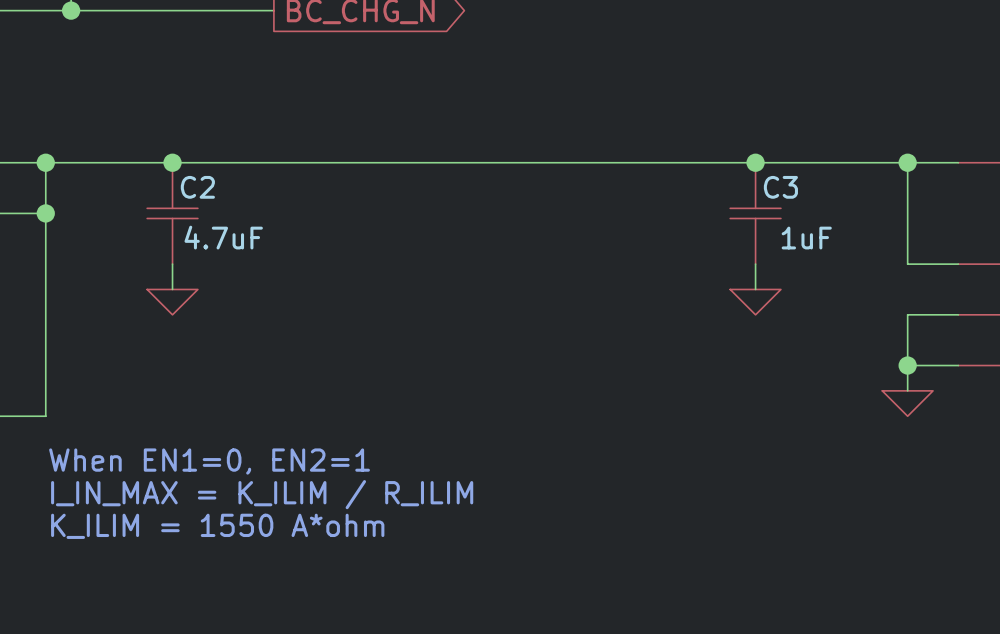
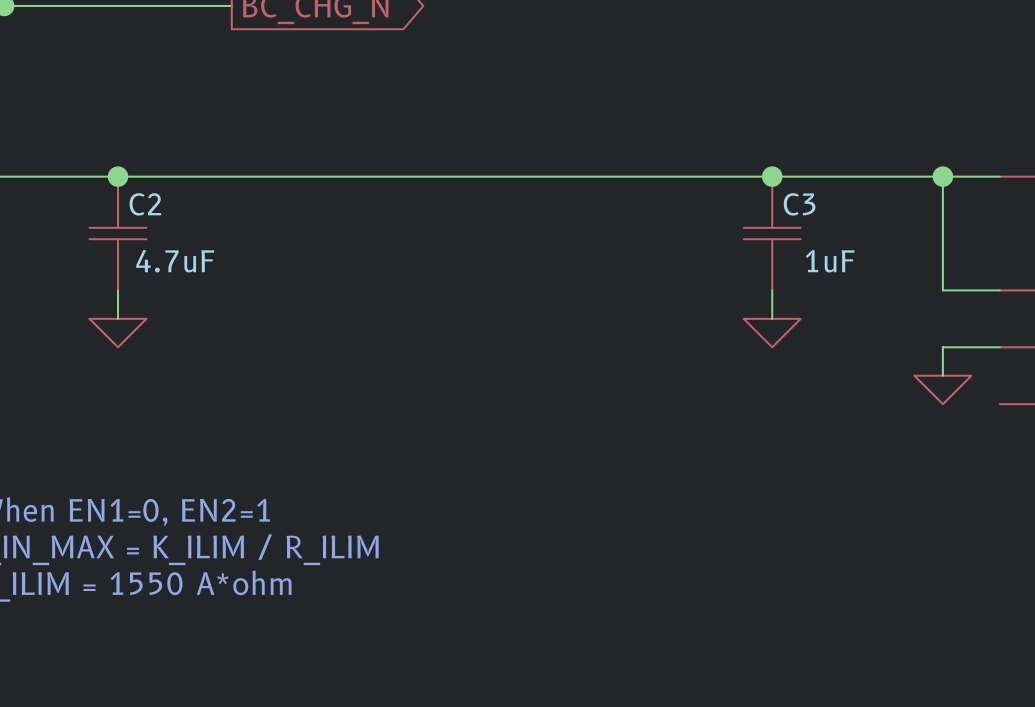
wire: (907, 340) (907, 390) -> none
wire: (907, 365) (958, 365) -> none
junction: (907, 365) -> none
power symbol position: (907, 403) -> (942, 389)

